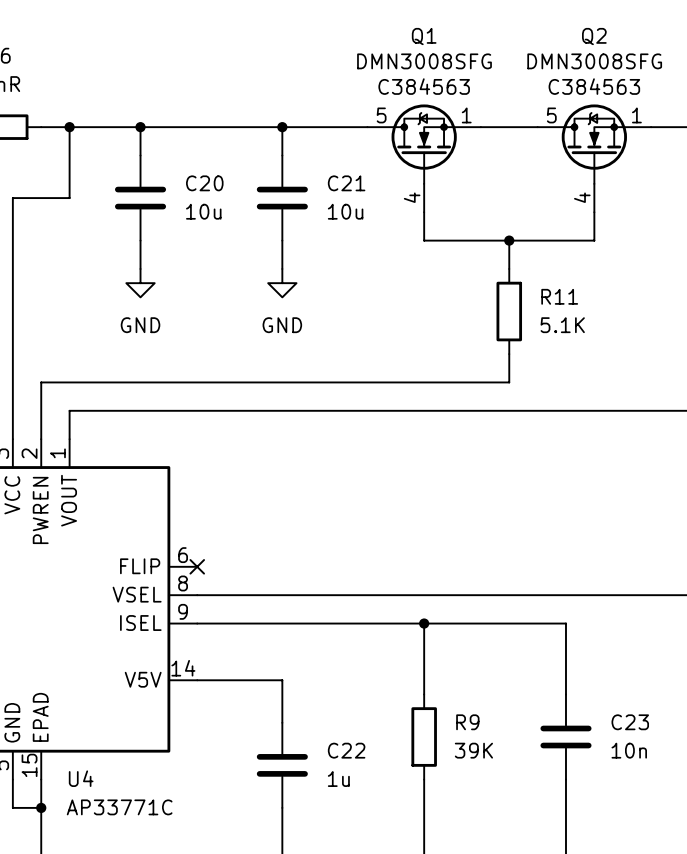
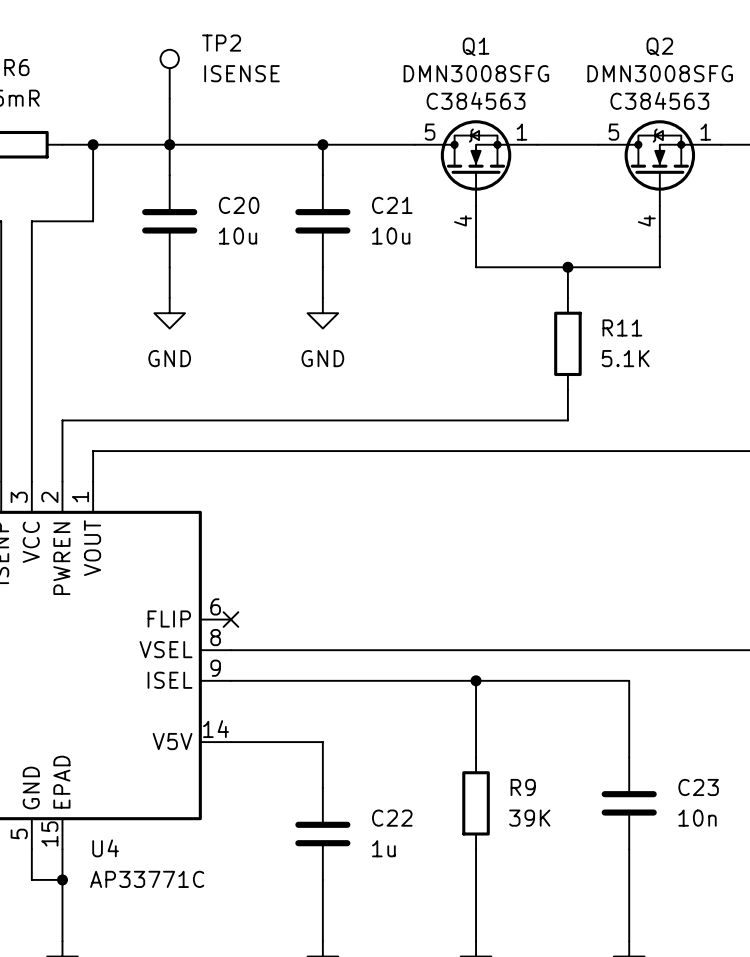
TP2: none -> ISENSE (169, 74)
wire: none -> (169, 98) (169, 144)

